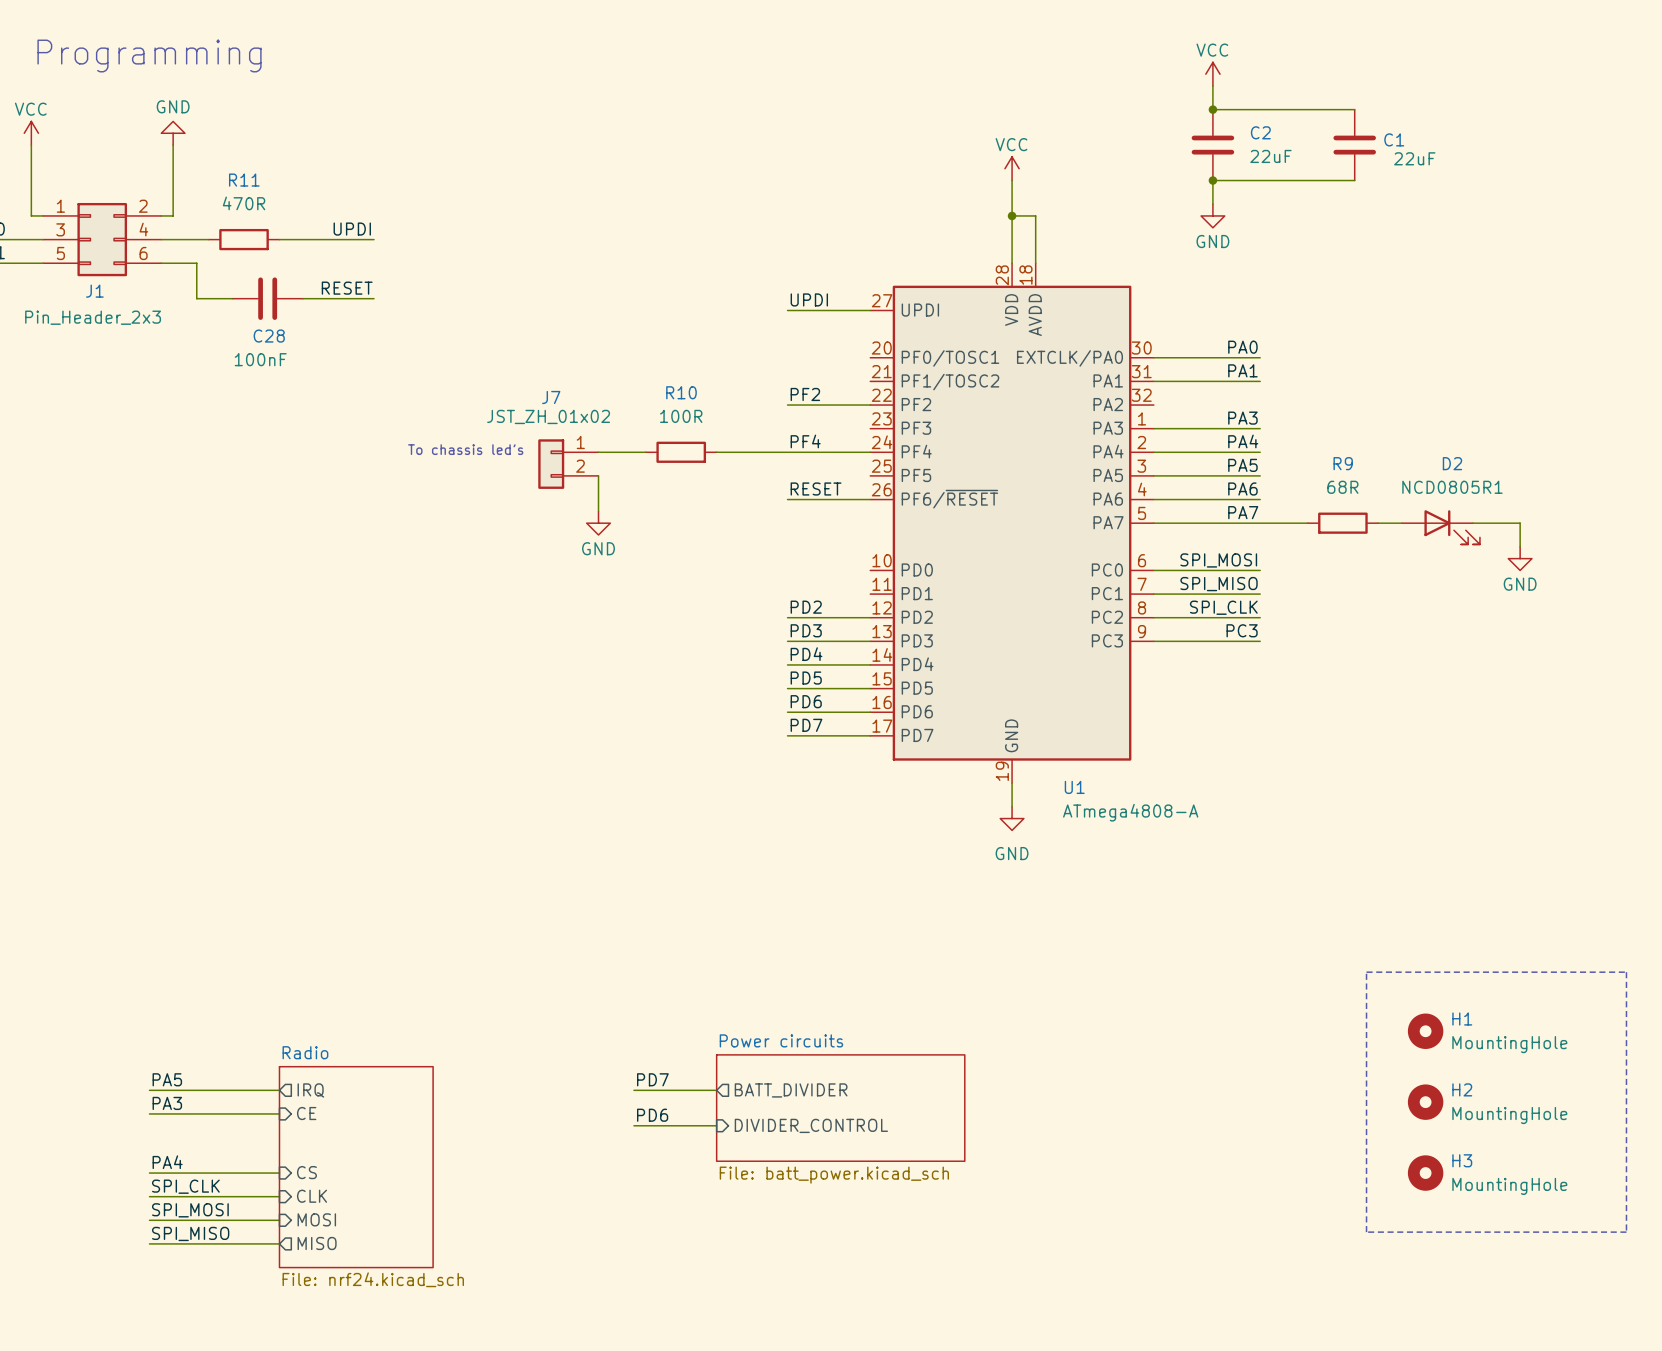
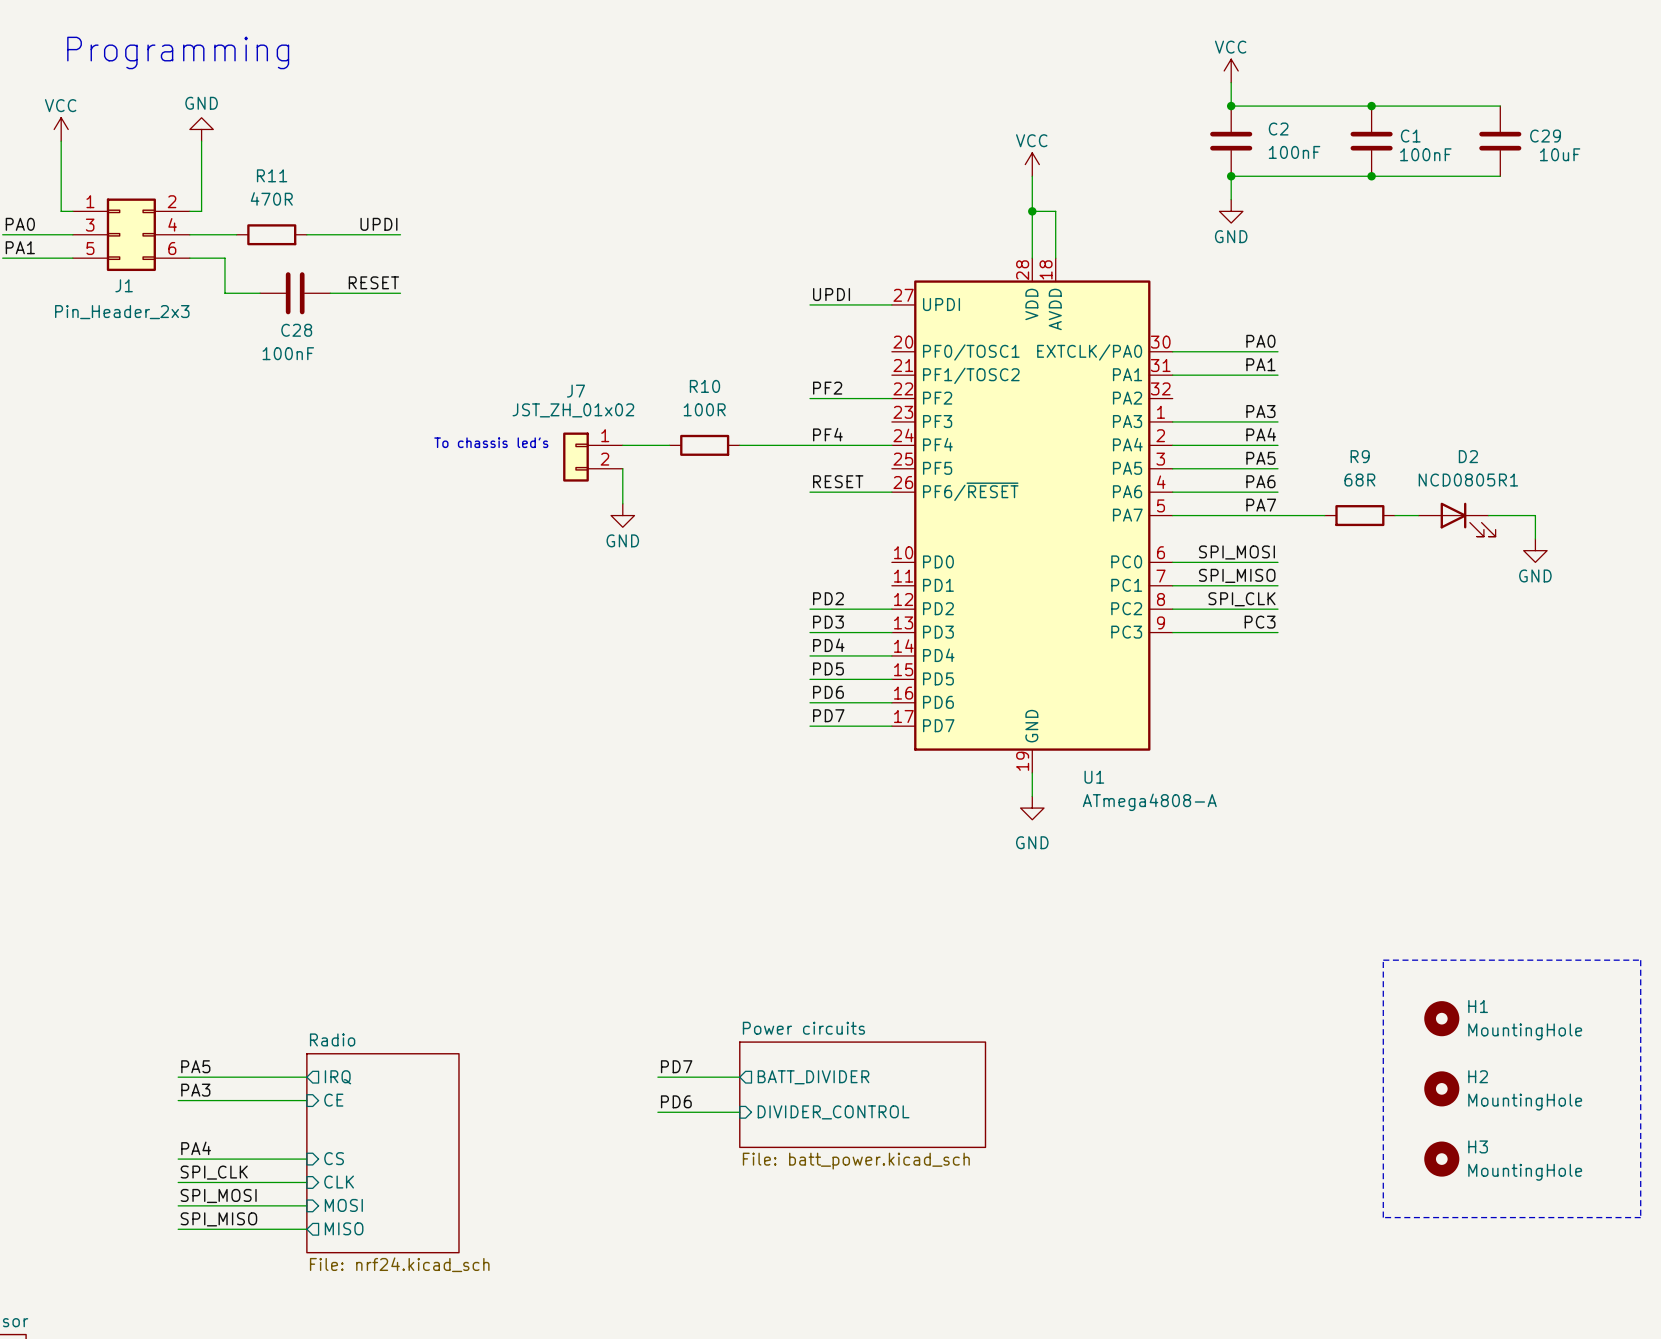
wire: none -> (1371, 106) (1500, 106)
junction: none -> (1371, 106)
C29: none -> 10uF (1500, 141)
C2 value: 22uF (1270, 156) -> 100nF (1294, 152)
C1 value: 22uF (1414, 158) -> 100nF (1425, 154)
wire: none -> (1371, 176) (1500, 176)
junction: none -> (1371, 176)

